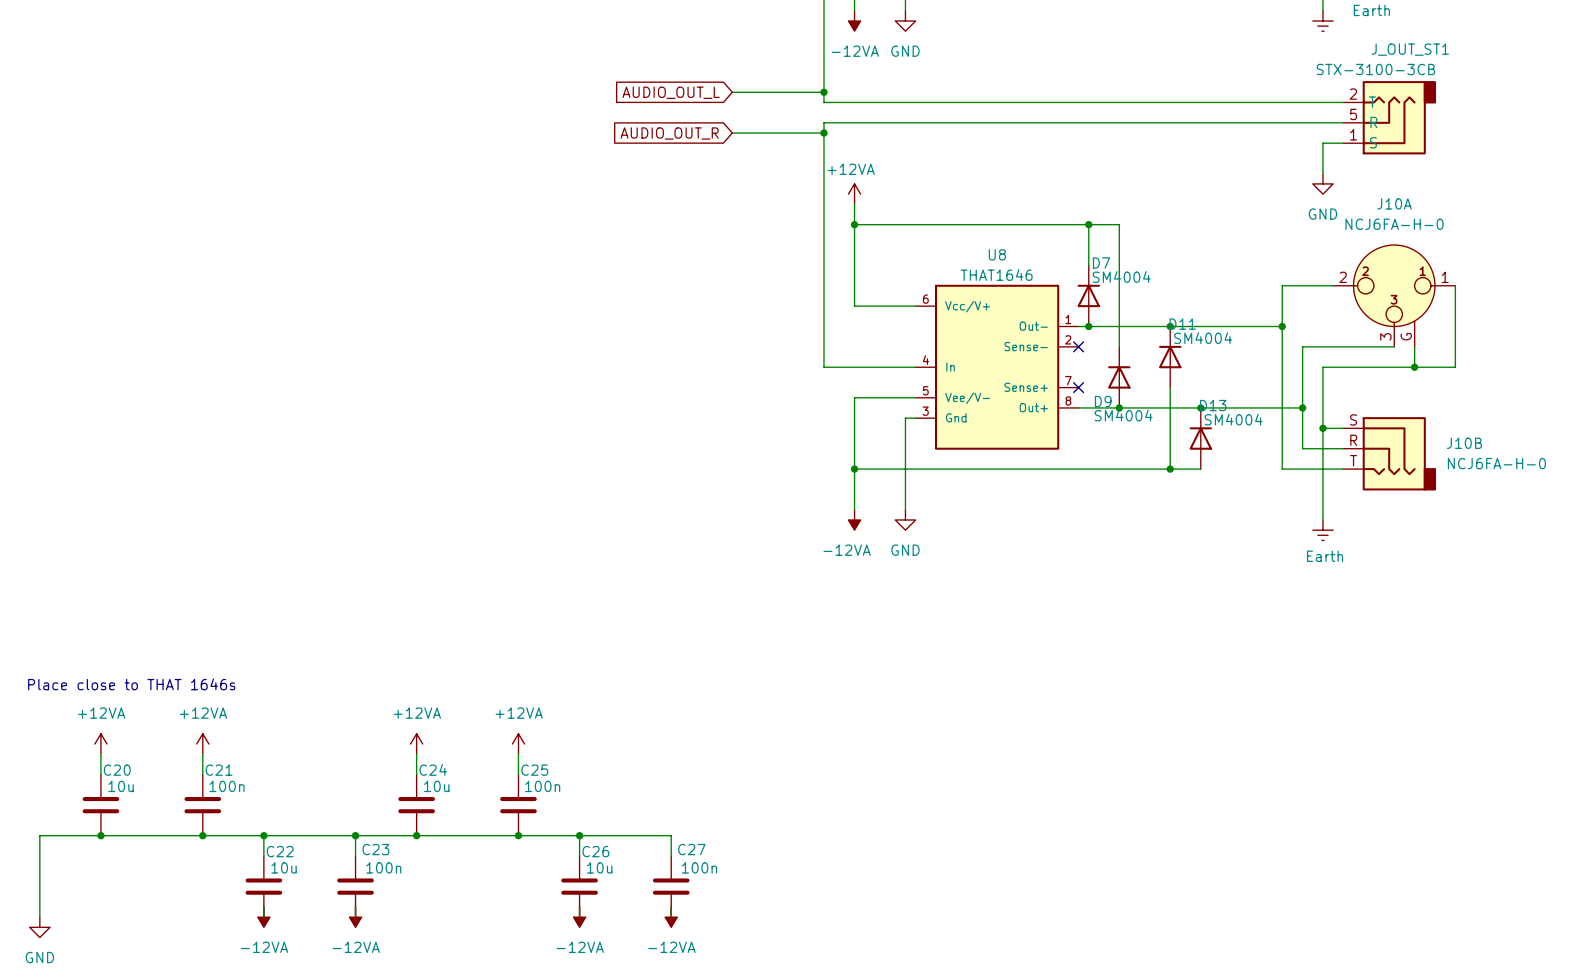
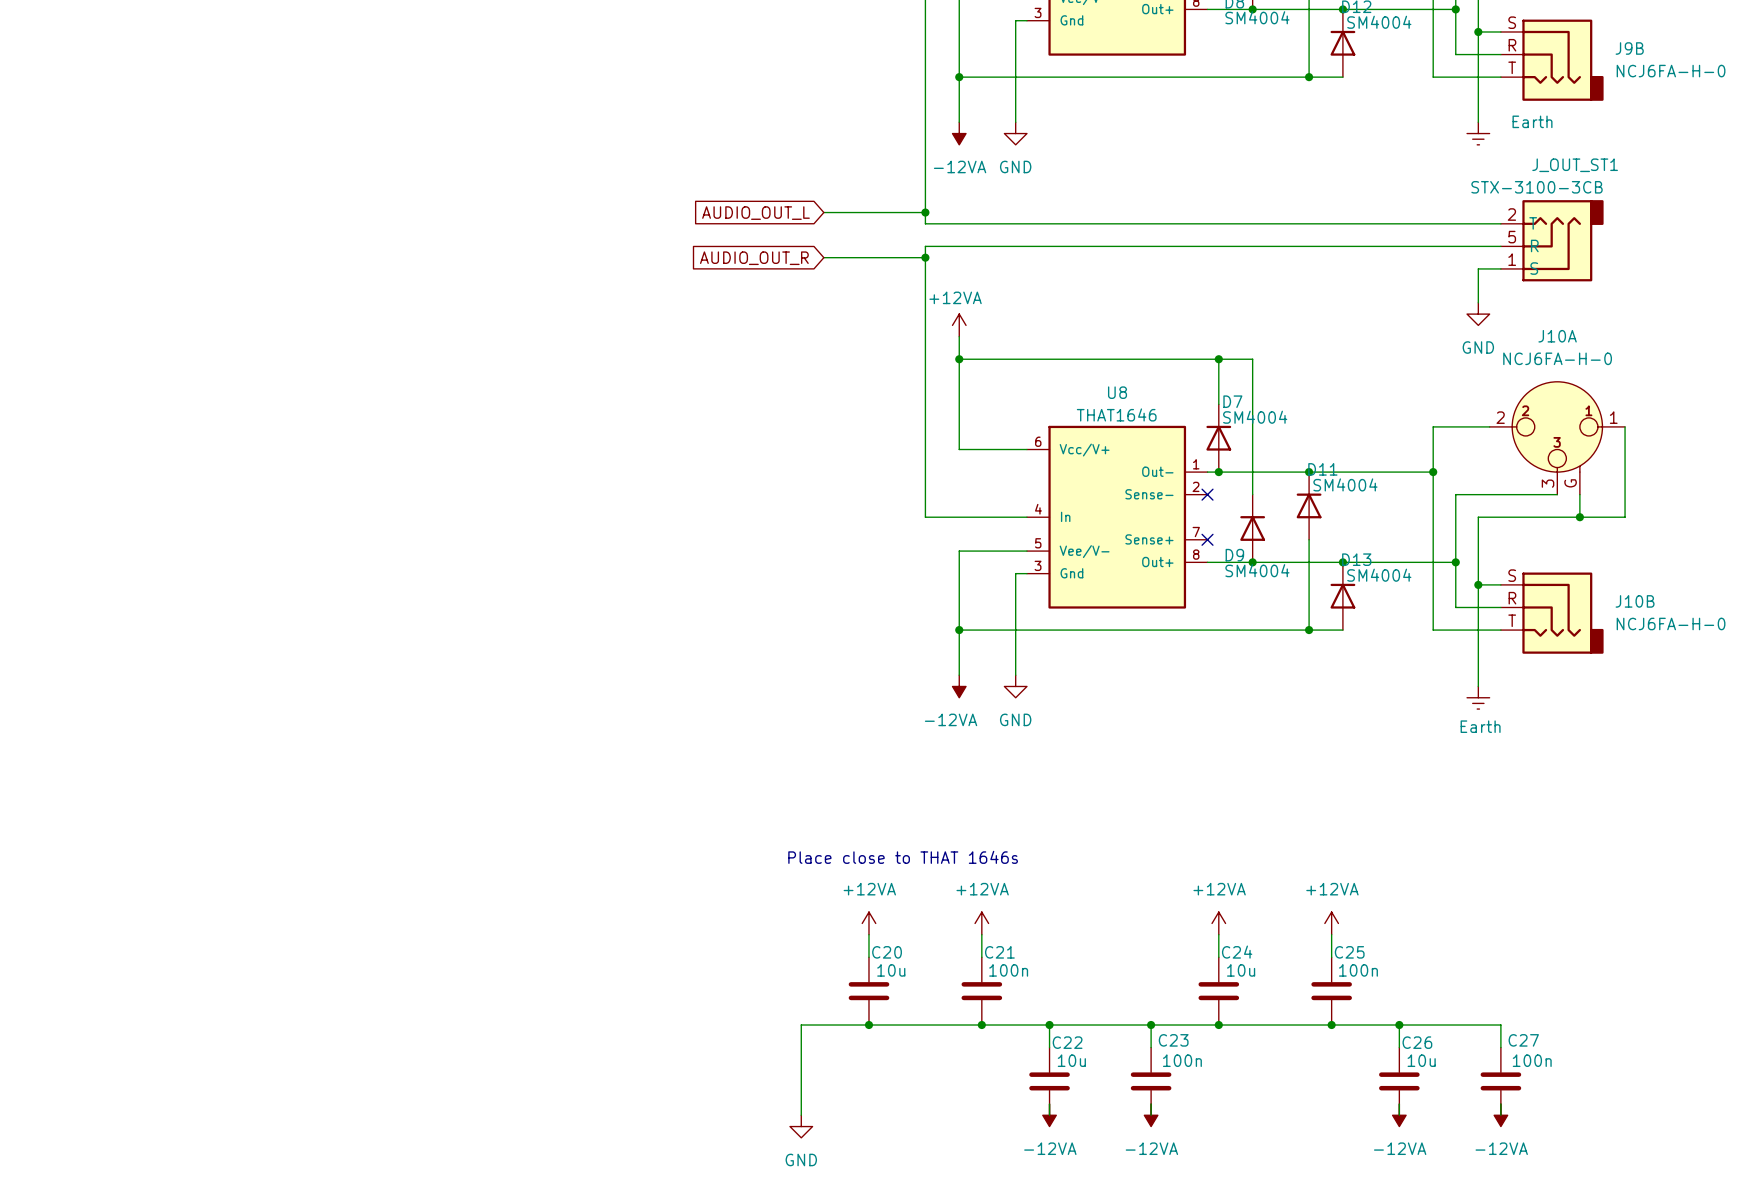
text: none -> Place close to THAT 1646s (903, 857)
text: Place close to THAT 1646s (131, 684) -> none
power symbol: none -> +12VA (868, 923)
power symbol: none -> +12VA (981, 923)
power symbol: none -> +12VA (1218, 923)
power symbol: none -> +12VA (1331, 923)
power symbol: +12VA (100, 744) -> none
power symbol: +12VA (202, 744) -> none
power symbol: +12VA (416, 744) -> none
power symbol: +12VA (518, 744) -> none
wire: none -> (868, 934) (868, 957)
wire: none -> (981, 934) (981, 957)
wire: none -> (1218, 934) (1218, 957)
wire: none -> (1331, 934) (1331, 957)
wire: (100, 754) (100, 774) -> none
wire: (202, 754) (202, 774) -> none
wire: (416, 754) (416, 774) -> none
wire: (518, 754) (518, 774) -> none
C20 position: (100, 805) -> (868, 991)
C21 position: (202, 805) -> (981, 991)
C24 position: (416, 805) -> (1218, 991)
C25 position: (518, 805) -> (1331, 991)
junction: none -> (868, 1025)
junction: none -> (981, 1025)
wire: none -> (1049, 1025) (1049, 1047)
junction: none -> (1049, 1025)
wire: none -> (1151, 1025) (1151, 1047)
junction: none -> (1151, 1025)
junction: none -> (1218, 1025)
junction: none -> (1331, 1025)
wire: none -> (1399, 1025) (1399, 1047)
junction: none -> (1399, 1025)
junction: (100, 835) -> none
junction: (202, 835) -> none
wire: (263, 835) (263, 856) -> none
junction: (263, 835) -> none
wire: (355, 835) (355, 856) -> none
junction: (355, 835) -> none
junction: (416, 835) -> none
junction: (518, 835) -> none
wire: (579, 835) (579, 856) -> none
junction: (579, 835) -> none
wire: none -> (1500, 1047) (1500, 1025) (801, 1025) (801, 1115)
wire: (671, 856) (671, 835) (39, 835) (39, 917) -> none
C22 position: (263, 886) -> (1049, 1081)
C23 position: (355, 886) -> (1151, 1081)
C26 position: (579, 886) -> (1399, 1081)
C27 position: (671, 886) -> (1500, 1081)
wire: none -> (1049, 1103) (1049, 1115)
wire: none -> (1151, 1103) (1151, 1115)
wire: none -> (1399, 1103) (1399, 1115)
wire: none -> (1500, 1103) (1500, 1115)
wire: (263, 906) (263, 917) -> none
wire: (355, 906) (355, 917) -> none
wire: (579, 906) (579, 917) -> none
wire: (671, 906) (671, 917) -> none
power symbol: none -> -12VA (1049, 1115)
power symbol: none -> -12VA (1151, 1115)
power symbol: none -> -12VA (1399, 1115)
power symbol: none -> -12VA (1500, 1115)
power symbol: -12VA (263, 917) -> none
power symbol: -12VA (355, 917) -> none
power symbol: -12VA (579, 917) -> none
power symbol: -12VA (671, 917) -> none
power symbol: none -> GND (801, 1126)
power symbol: GND (39, 927) -> none

